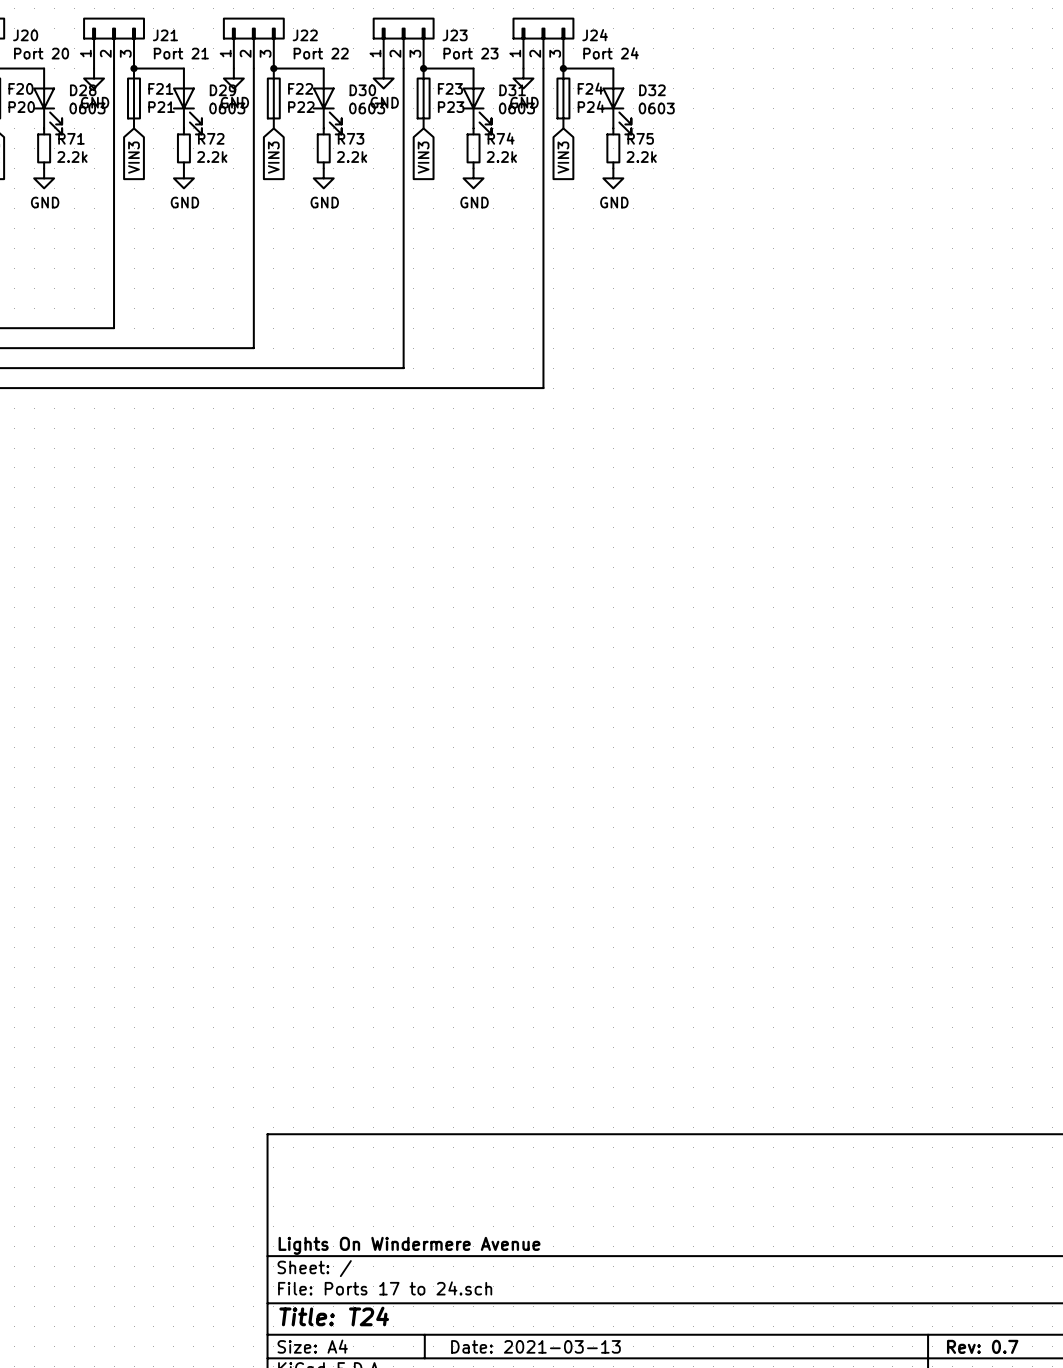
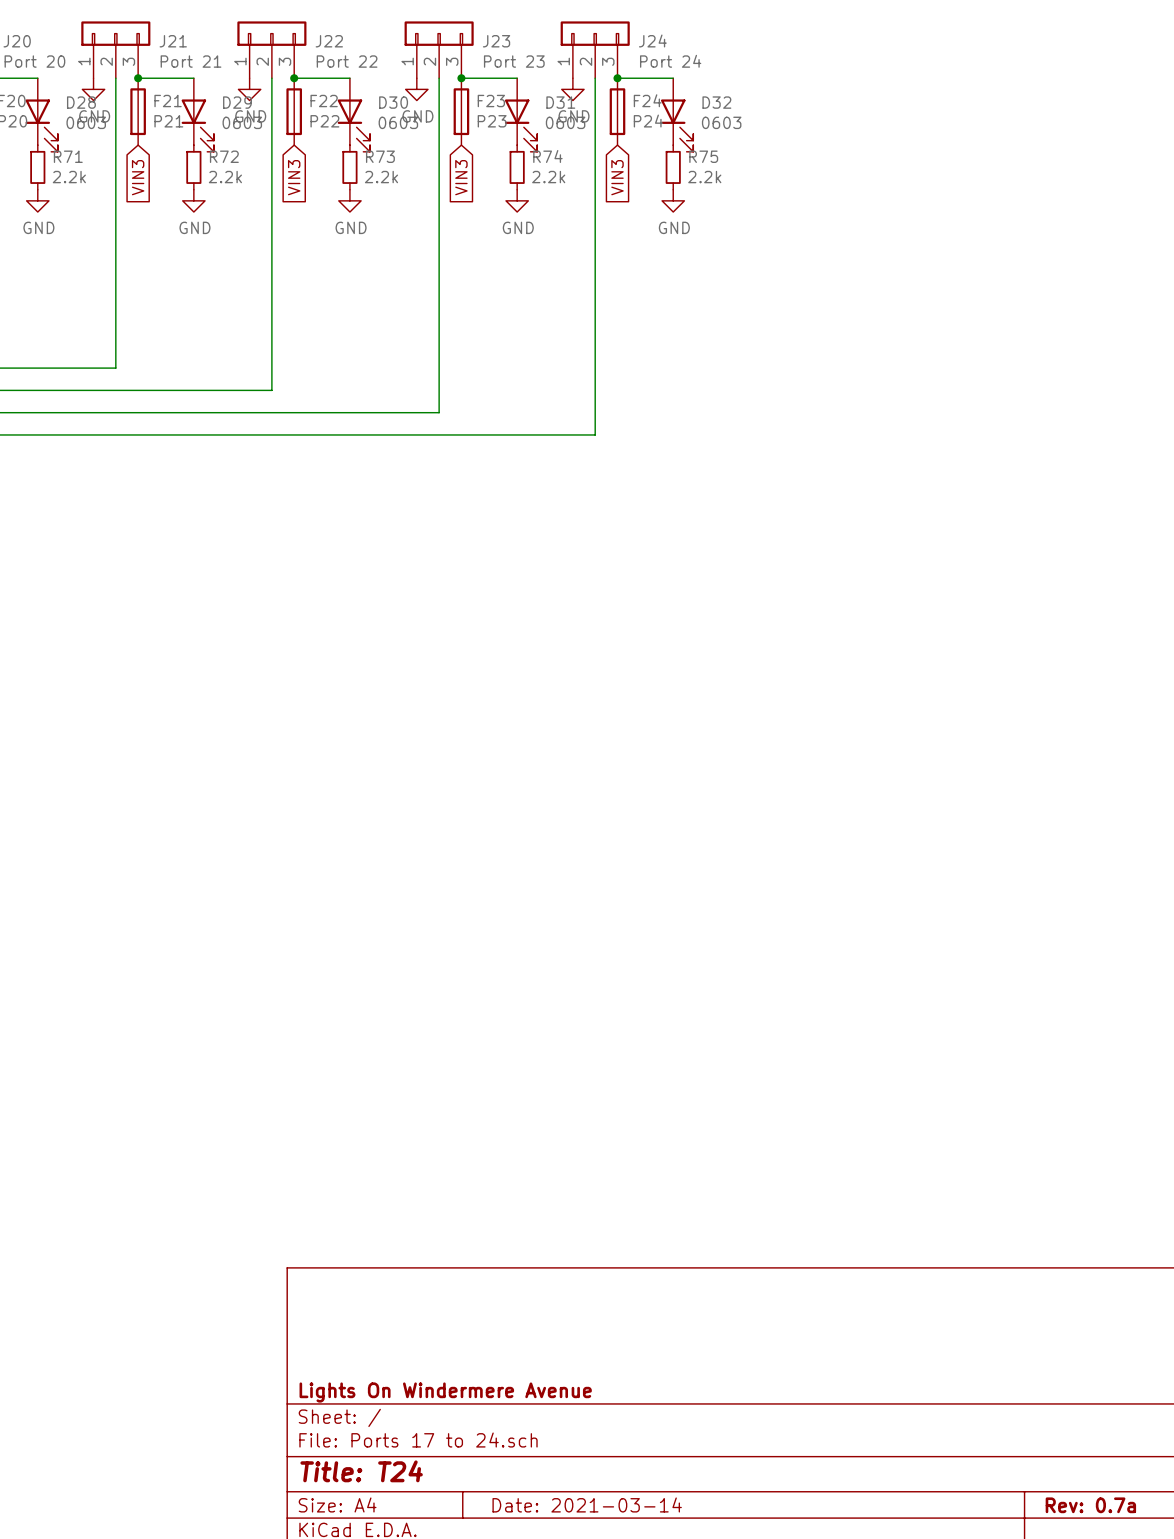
title block: Date: 2021-03-13 (535, 1346) -> Date: 2021-03-14 (587, 1504)
title block: Rev: 0.7 (982, 1346) -> Rev: 0.7a (1090, 1505)

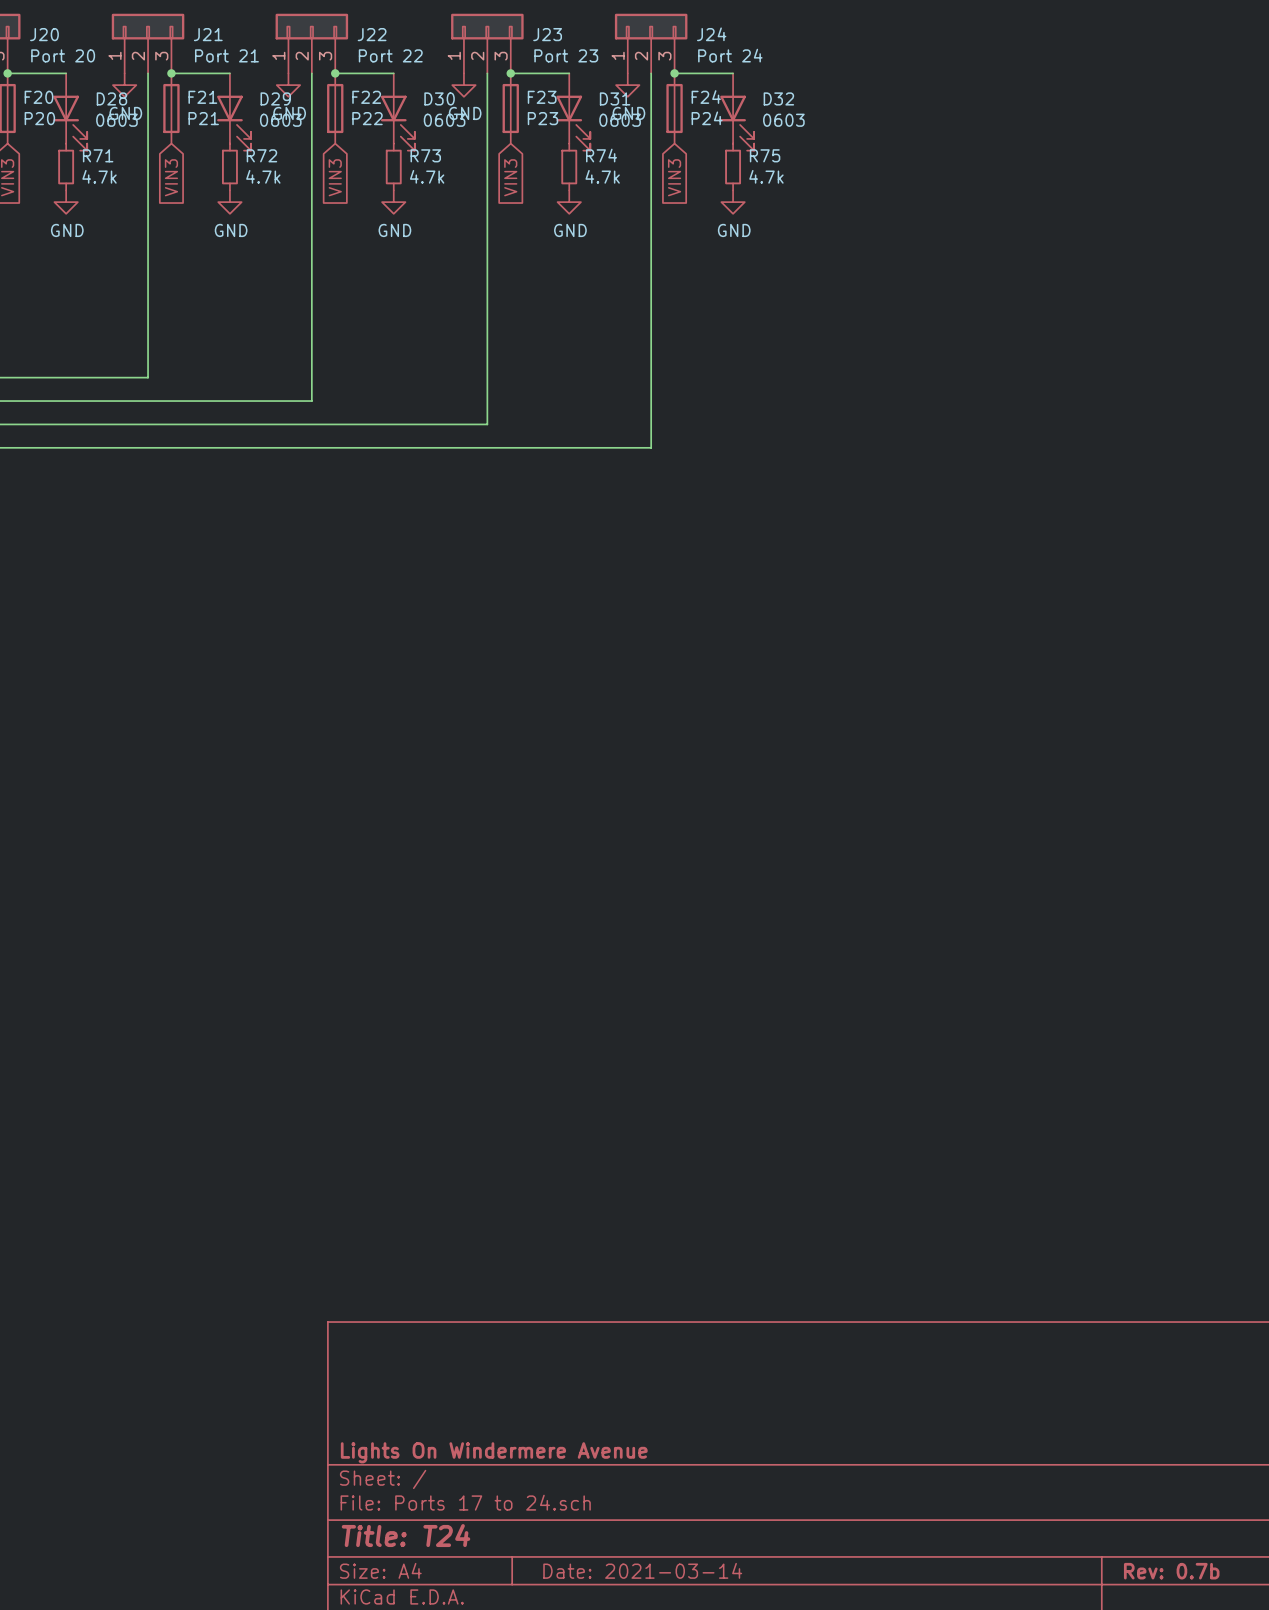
R71 value: 2.2k (69, 177) -> 4.7k (99, 176)
R72 value: 2.2k (225, 177) -> 4.7k (263, 176)
R73 value: 2.2k (381, 177) -> 4.7k (427, 176)
R74 value: 2.2k (548, 177) -> 4.7k (602, 176)
R75 value: 2.2k (704, 177) -> 4.7k (766, 176)
title block: Rev: 0.7a (1090, 1505) -> Rev: 0.7b (1171, 1571)

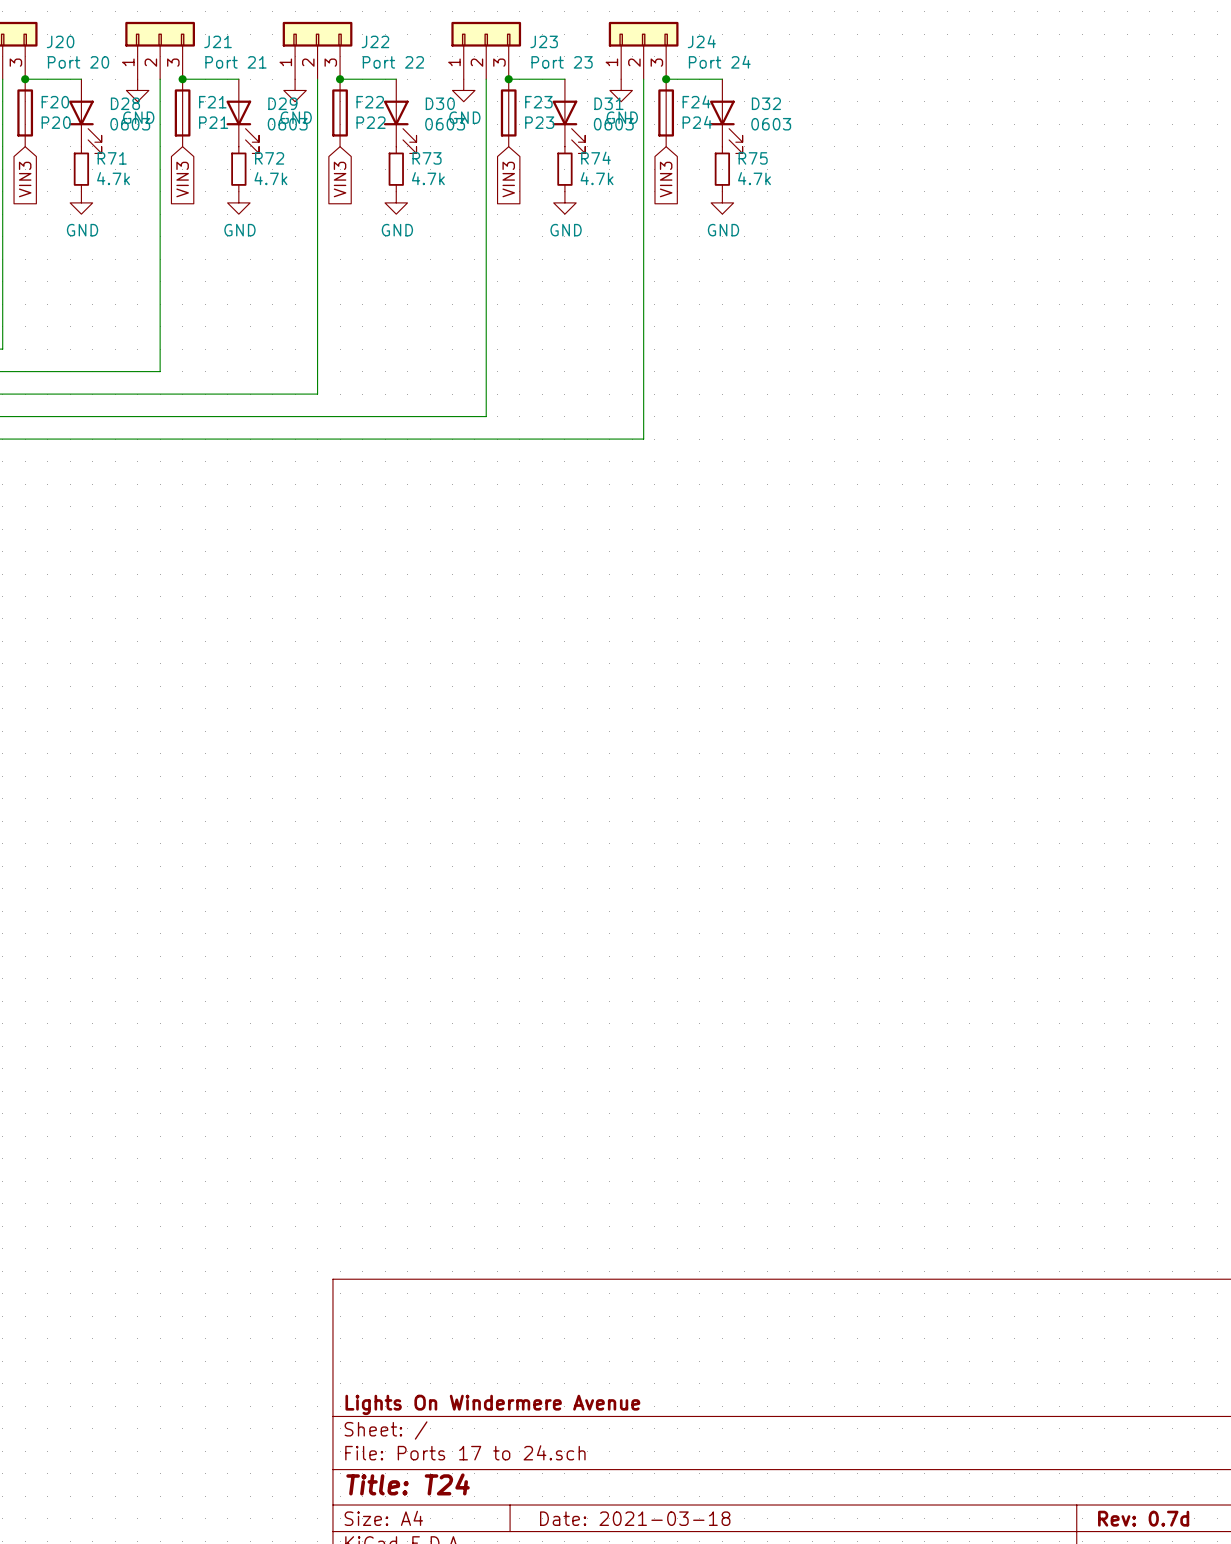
title block: Date: 2021-03-14 (642, 1570) -> Date: 2021-03-18 (635, 1518)
title block: Rev: 0.7b (1171, 1571) -> Rev: 0.7d (1143, 1518)

